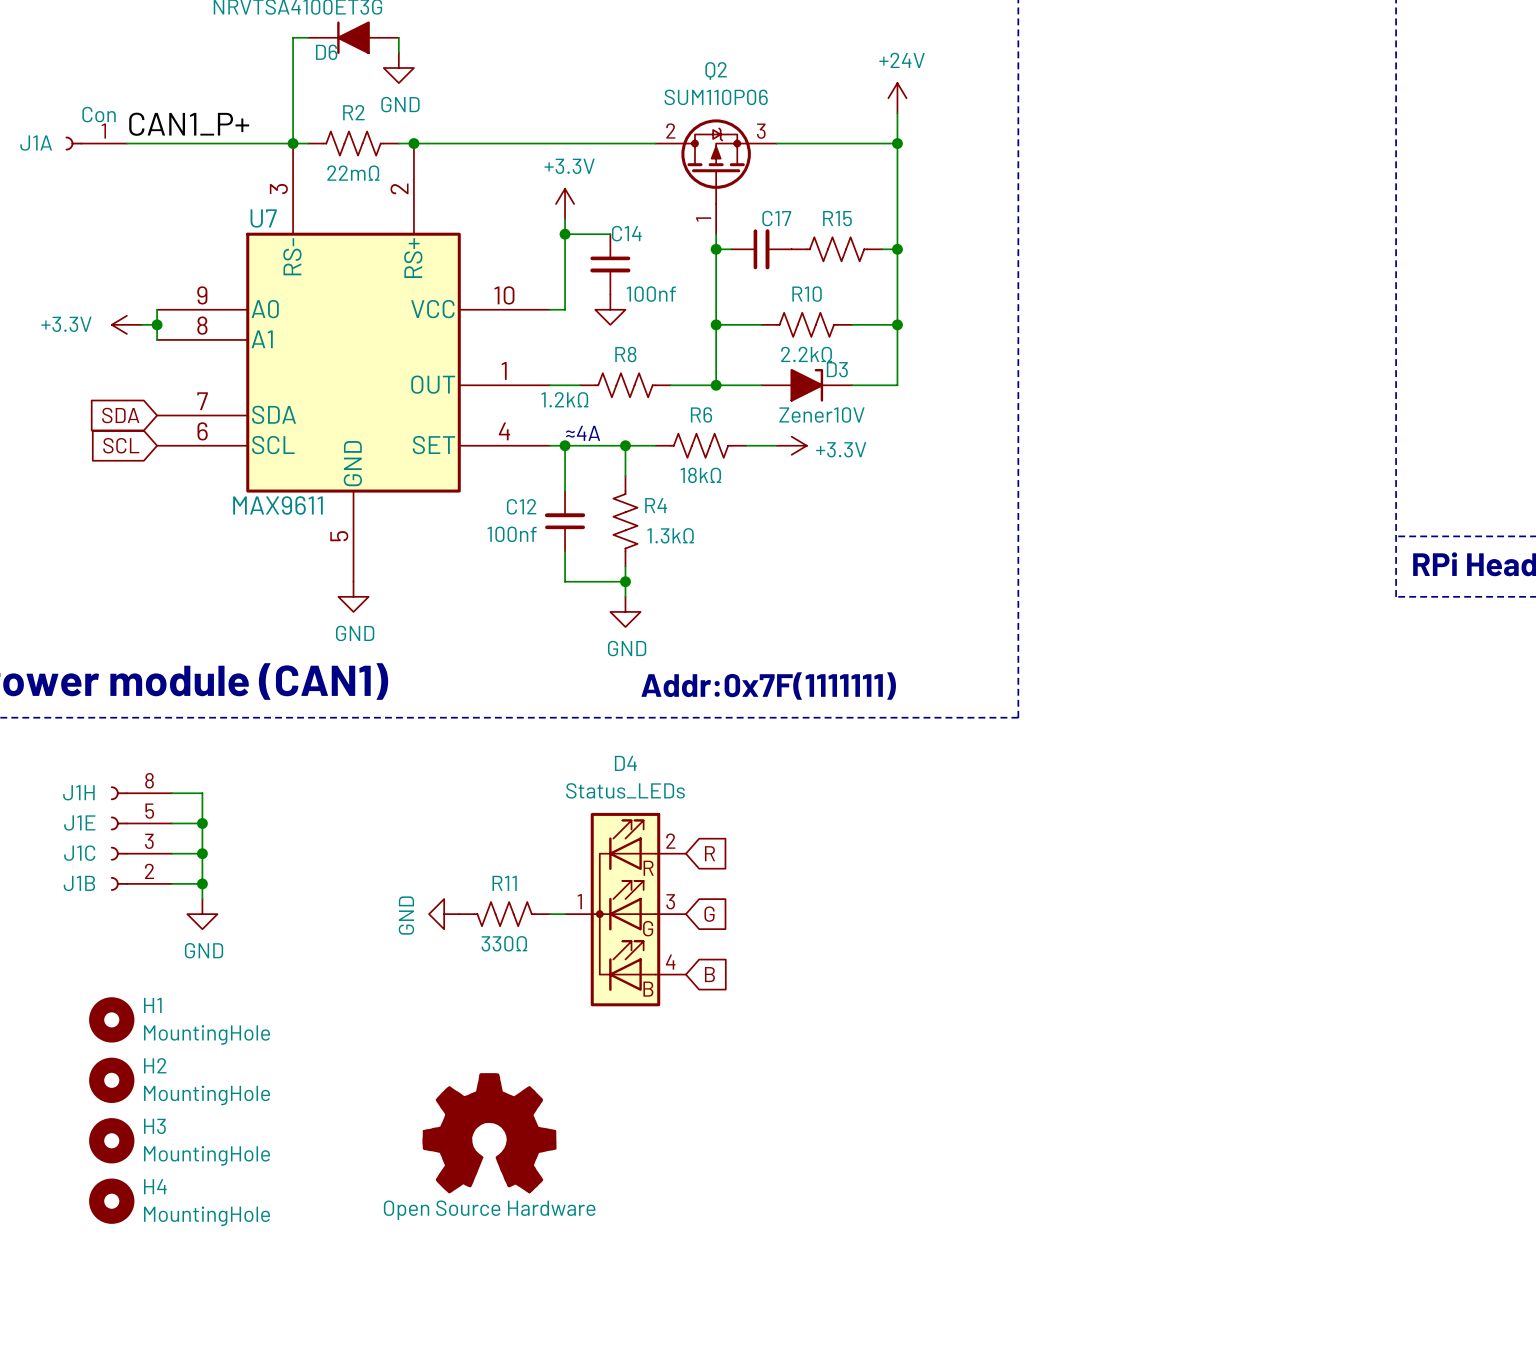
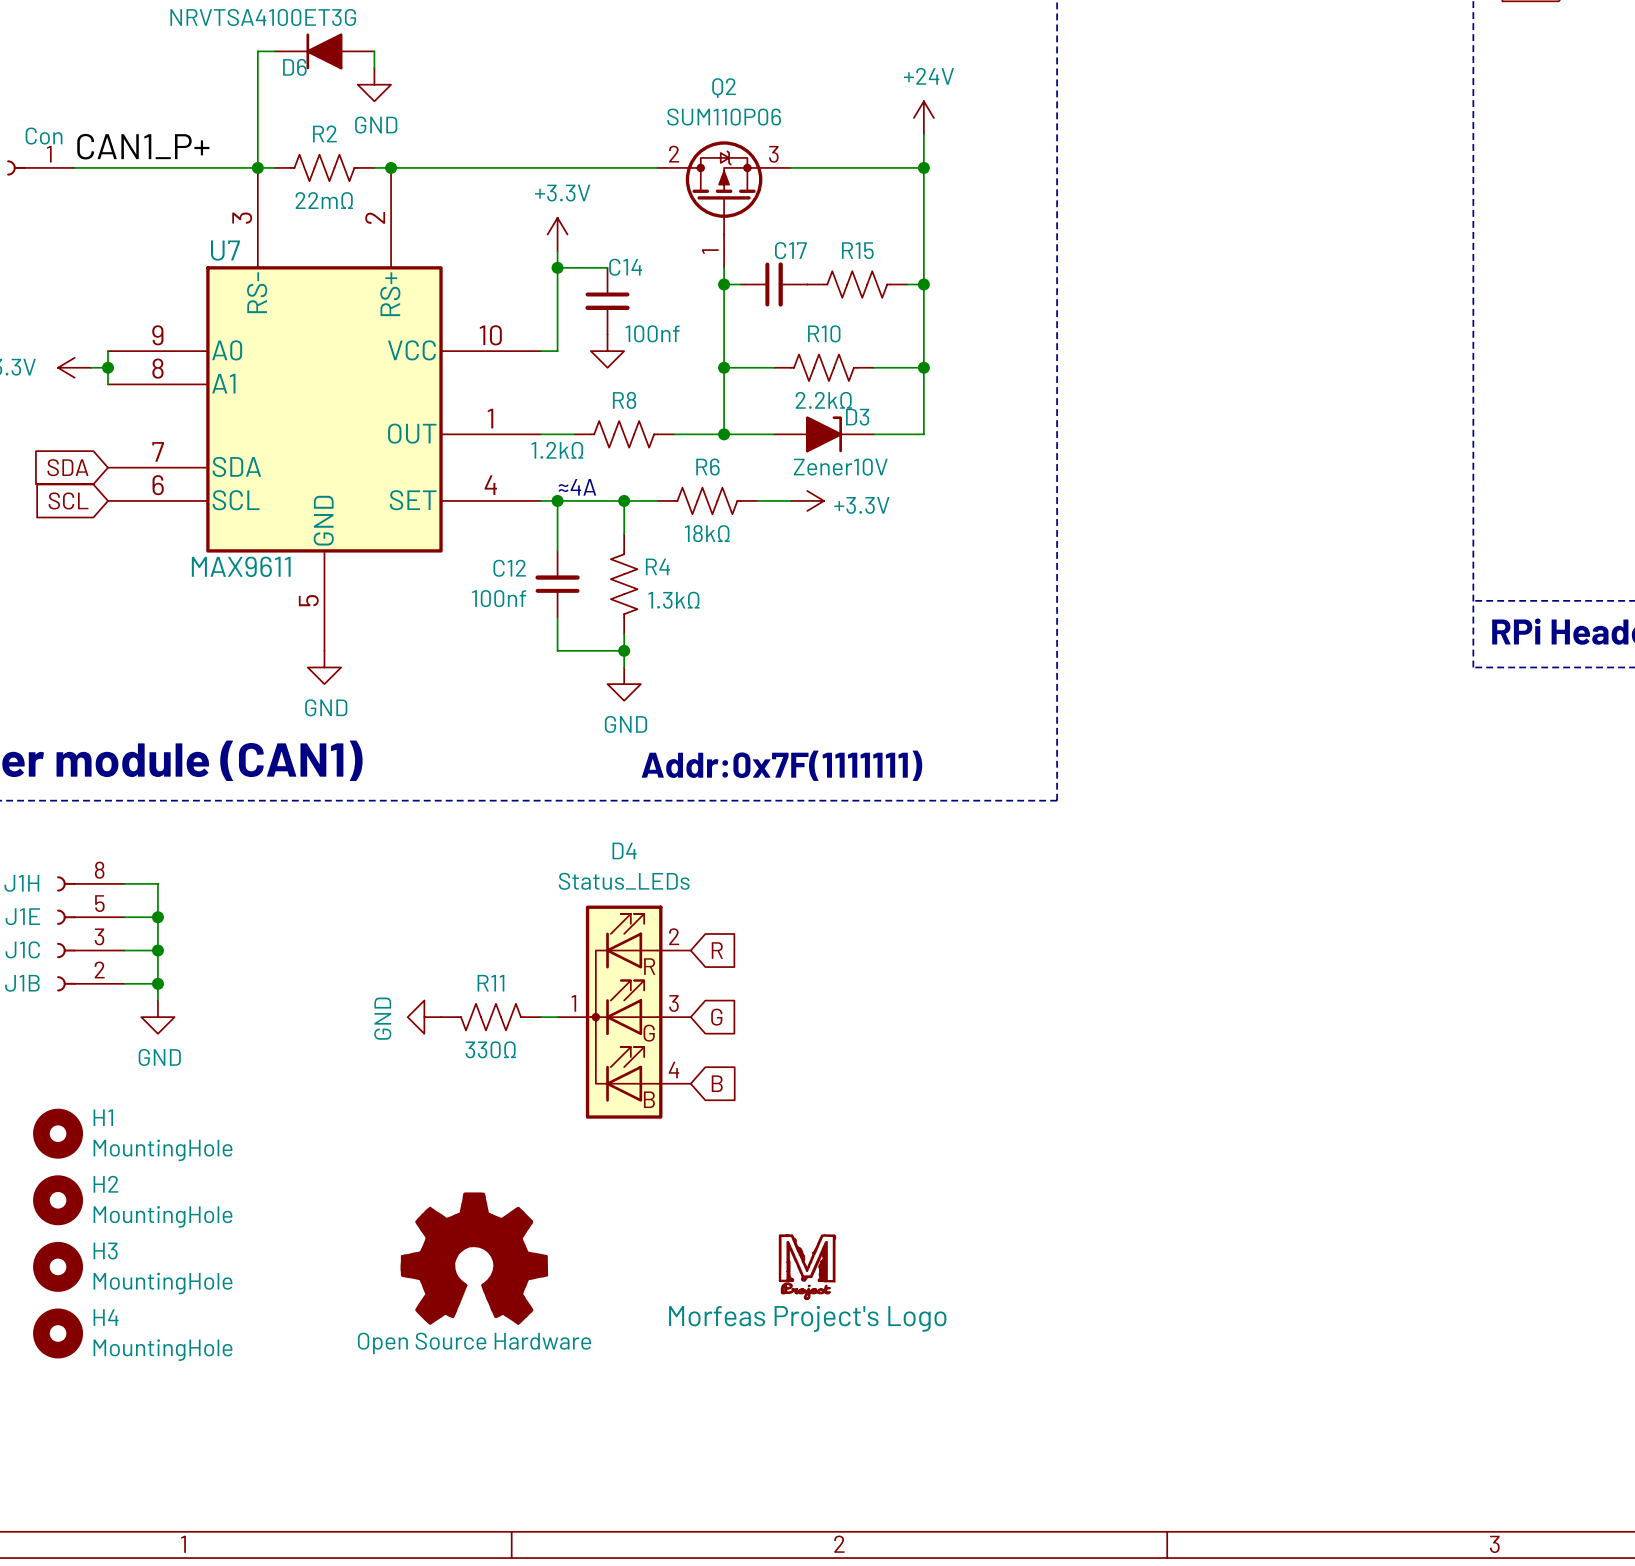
part: none -> Morfeas Project's Logo (807, 1267)

